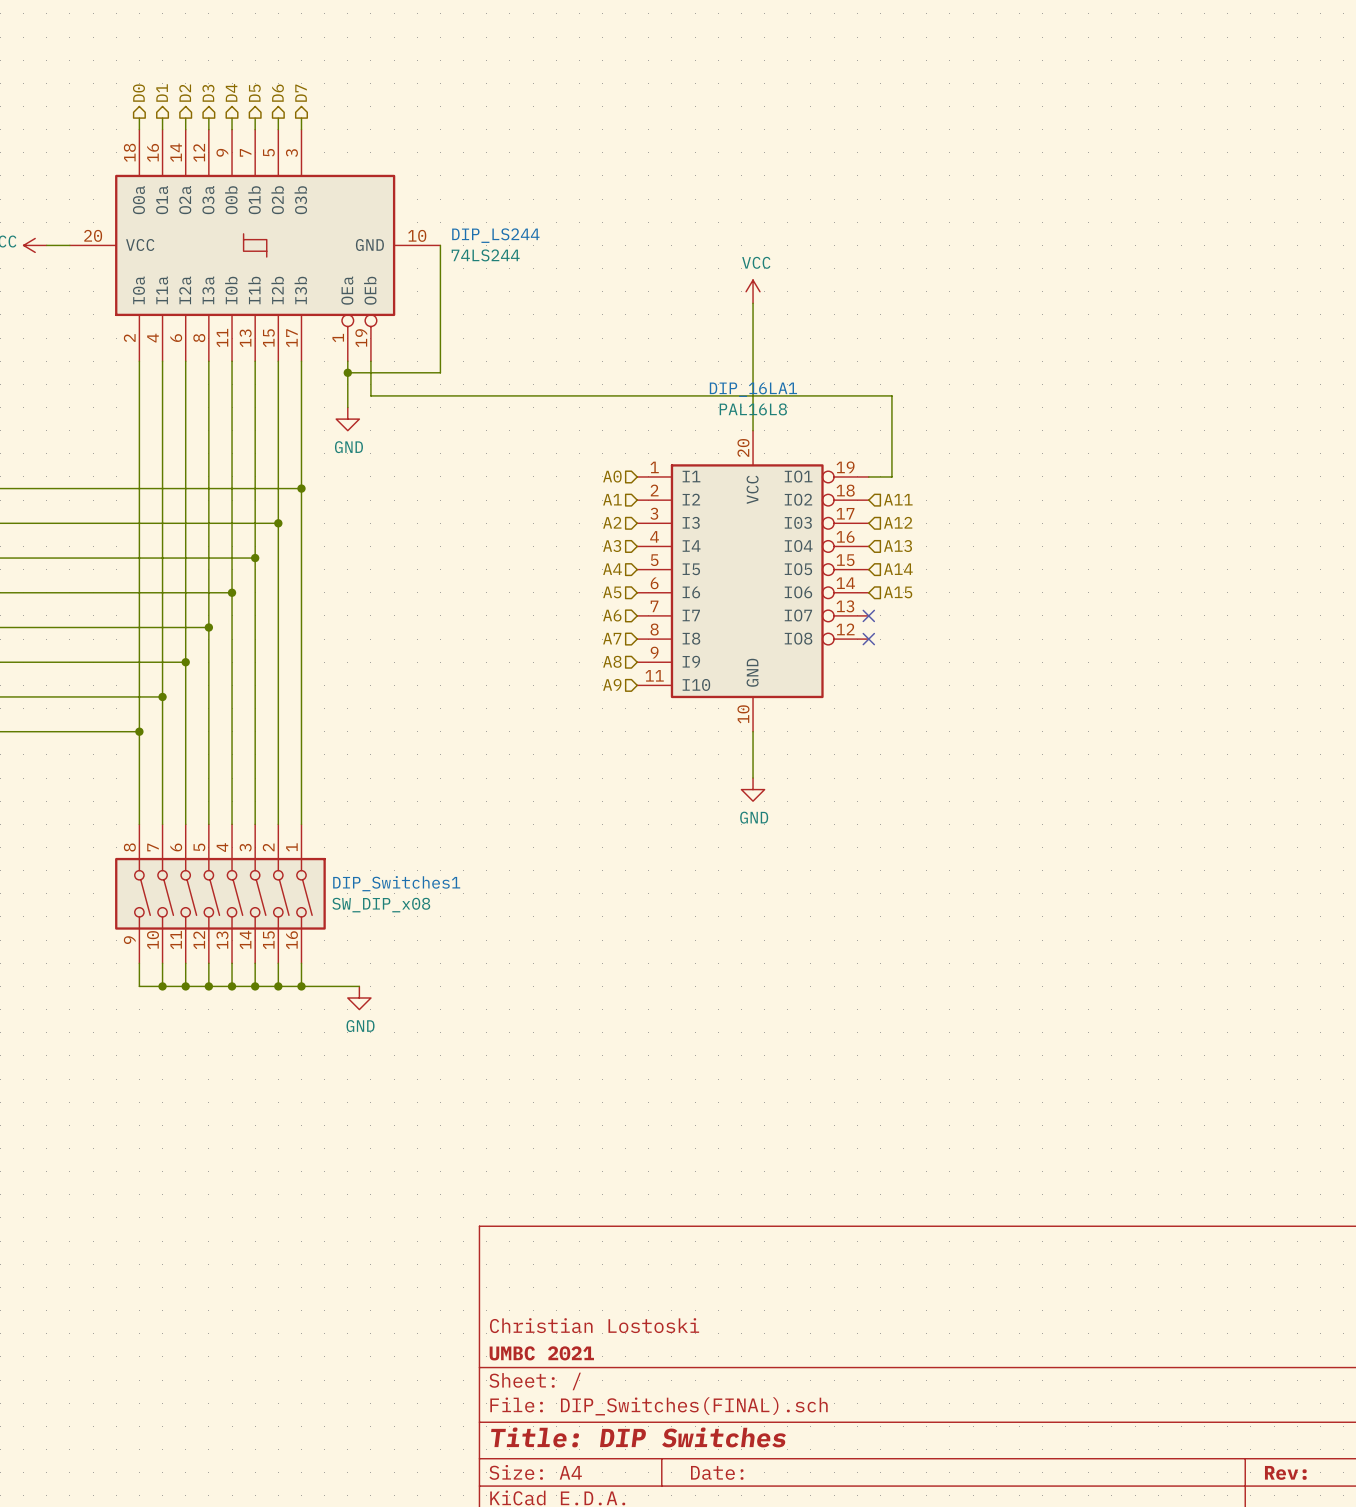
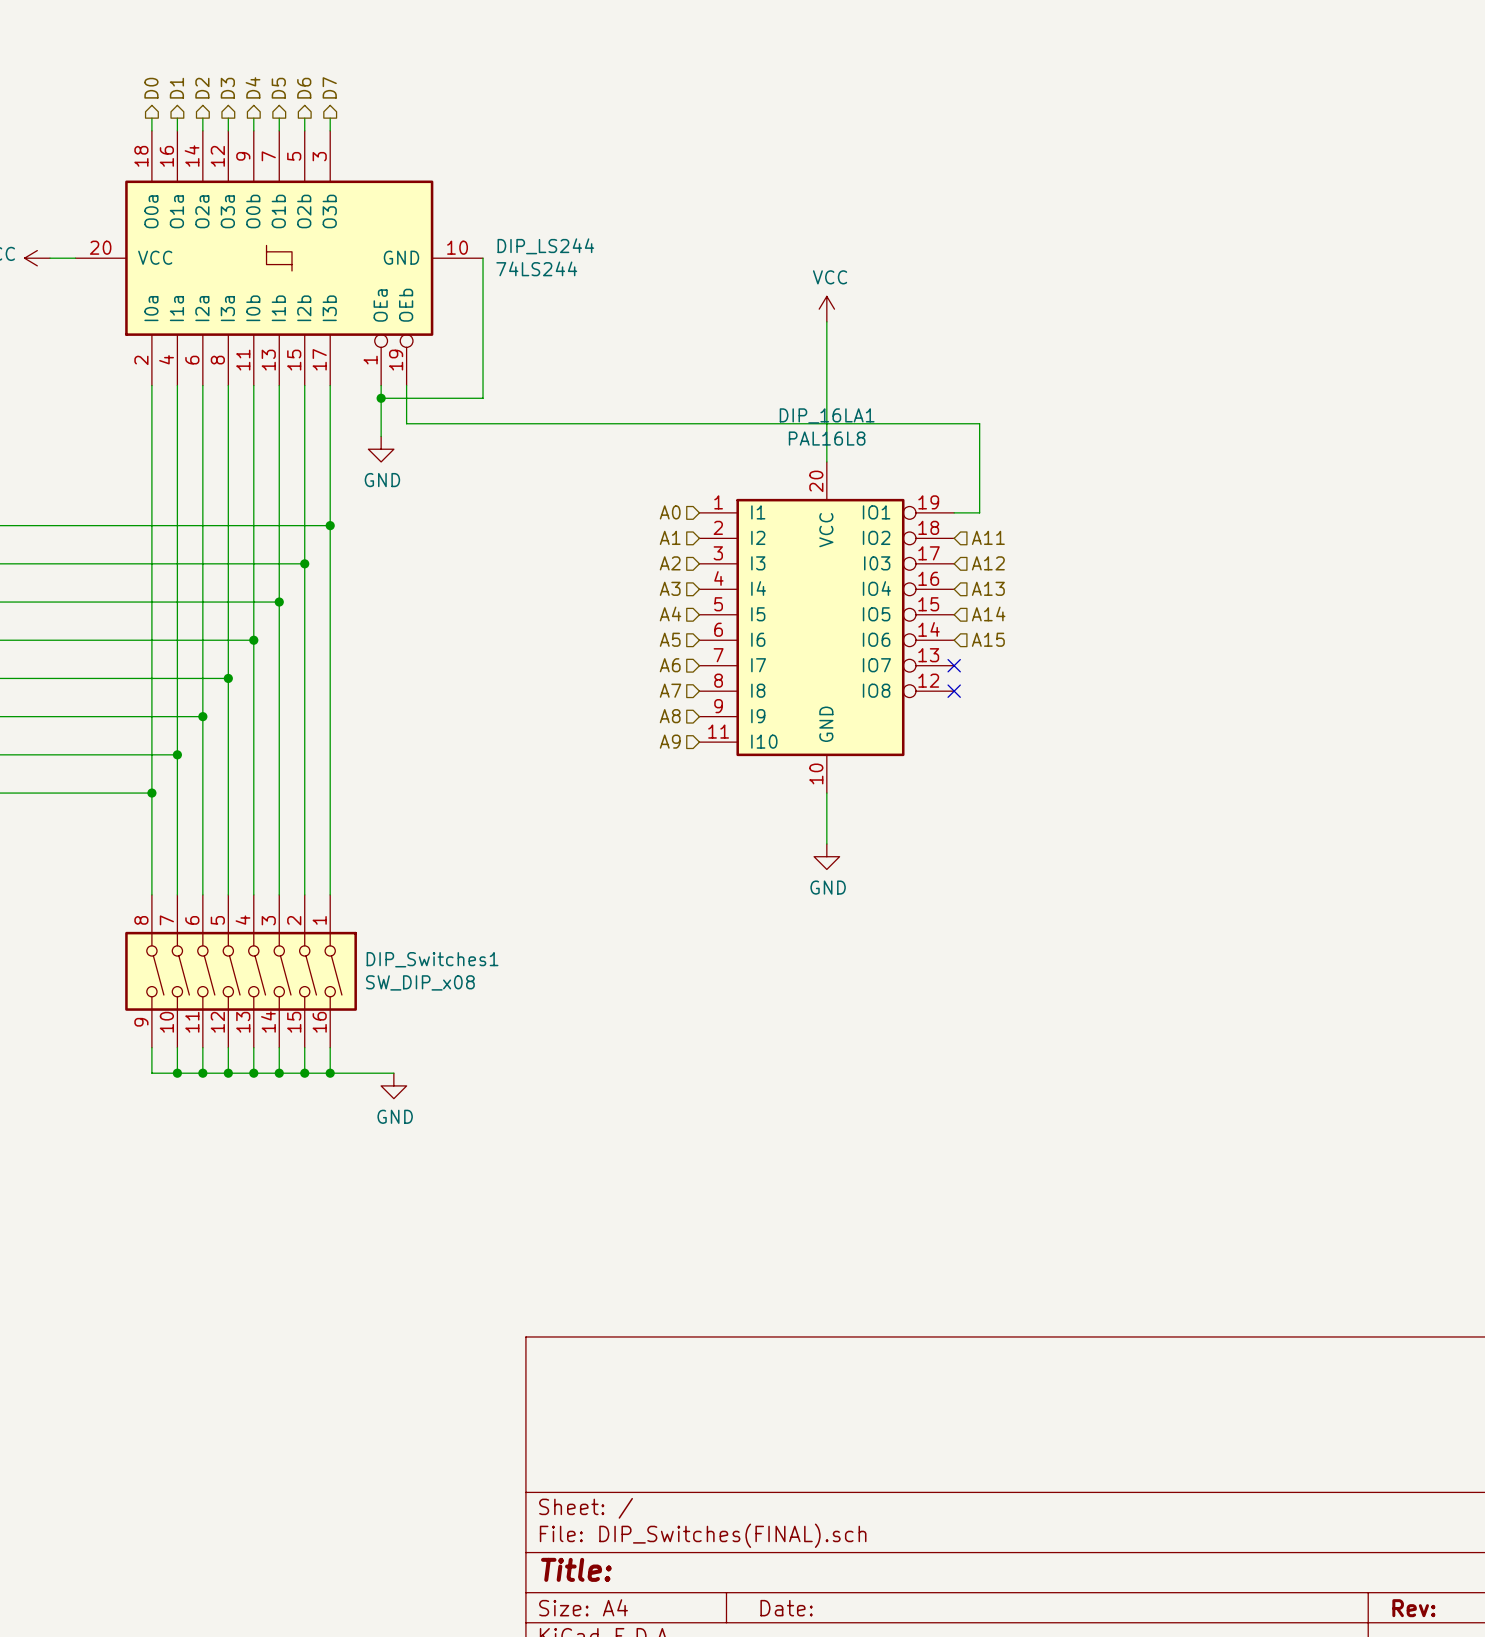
title block: Christian Lostoski (594, 1325) -> none
title block: UMBC 2021 (541, 1353) -> none
title block: Title: DIP Switches (638, 1437) -> Title: (576, 1569)

